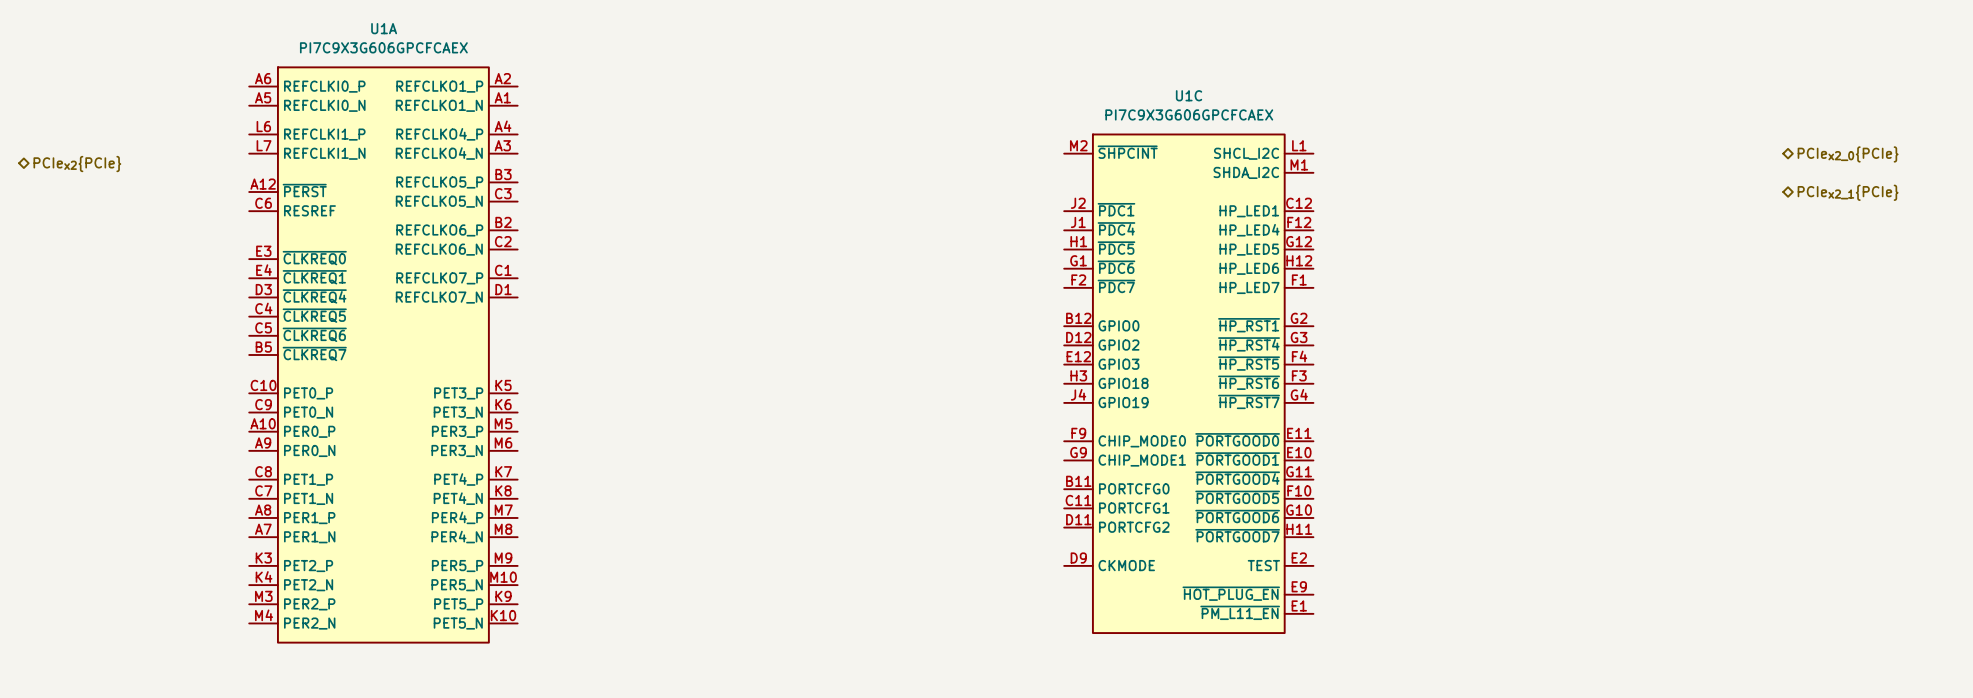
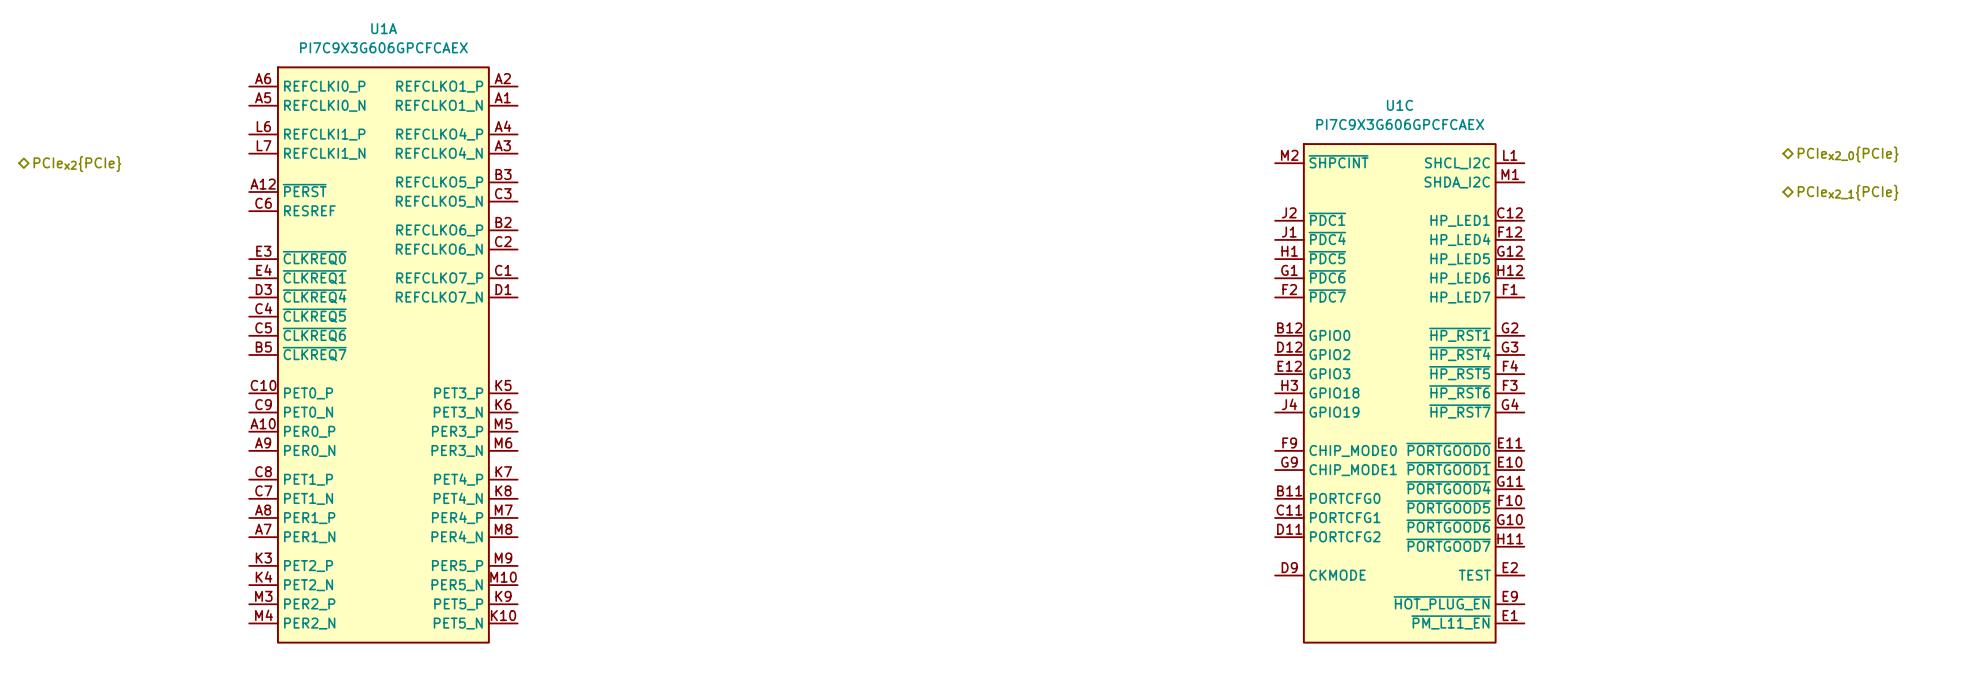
U1C position: (1188, 383) -> (1399, 393)

